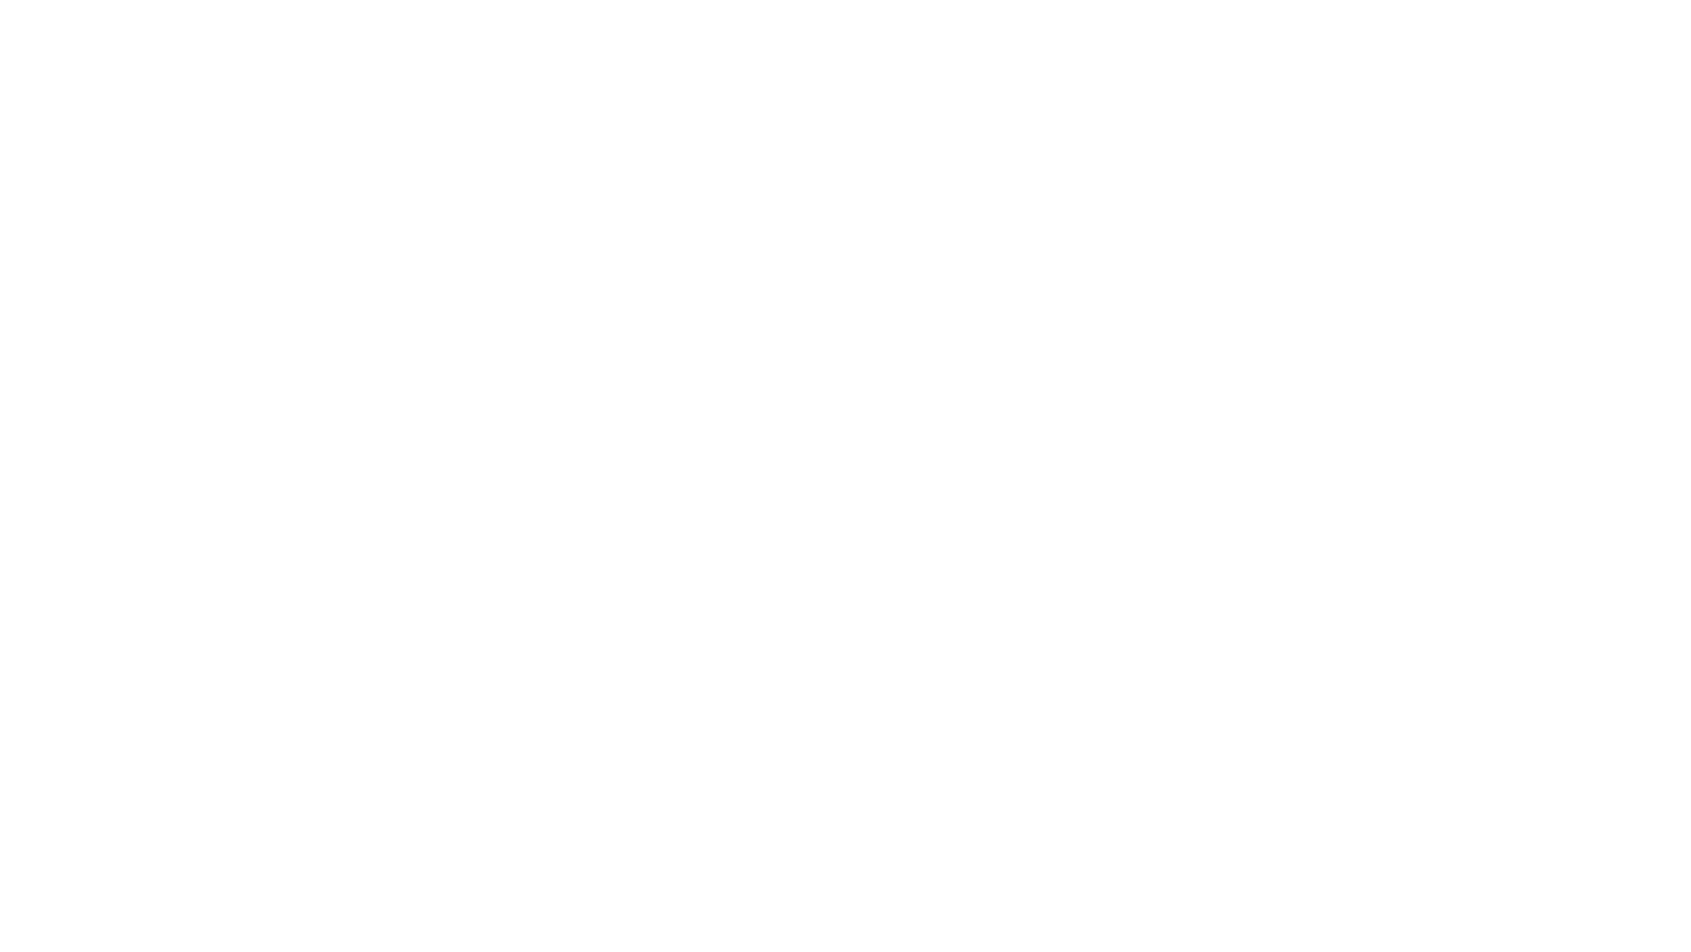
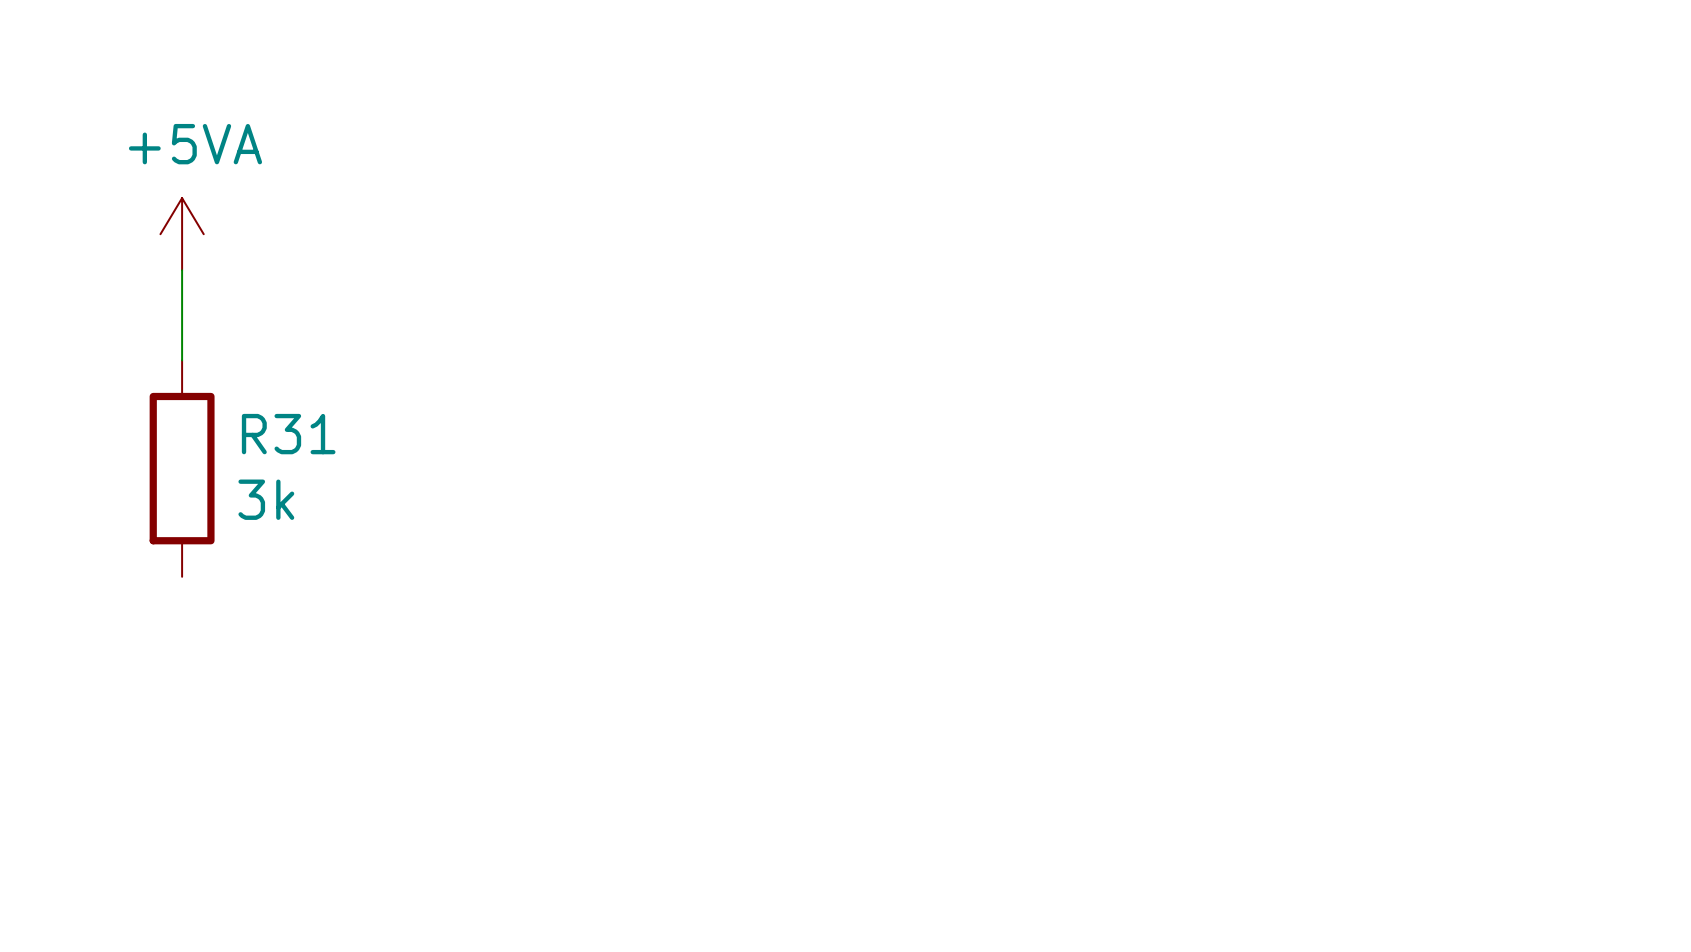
power symbol: none -> +5VA (182, 234)
wire: none -> (182, 270) (182, 360)
R31: none -> 3k (182, 468)

